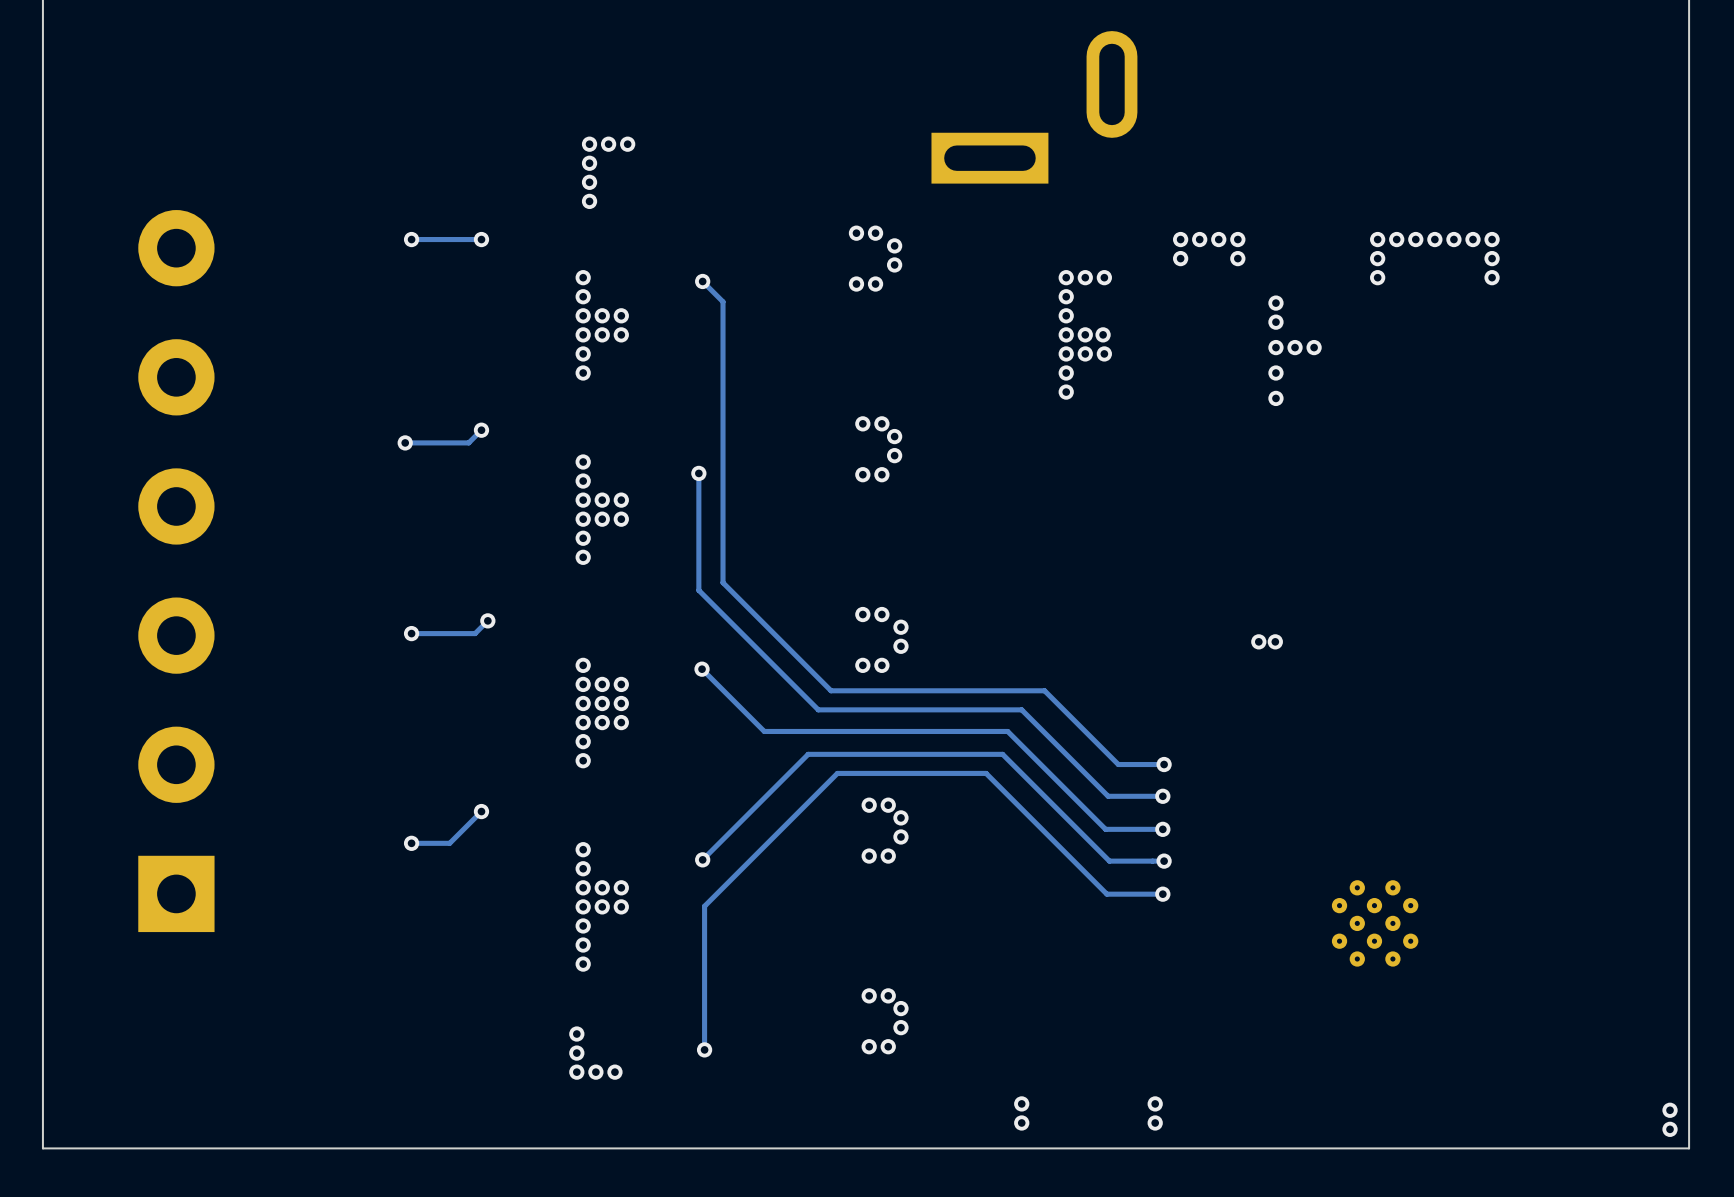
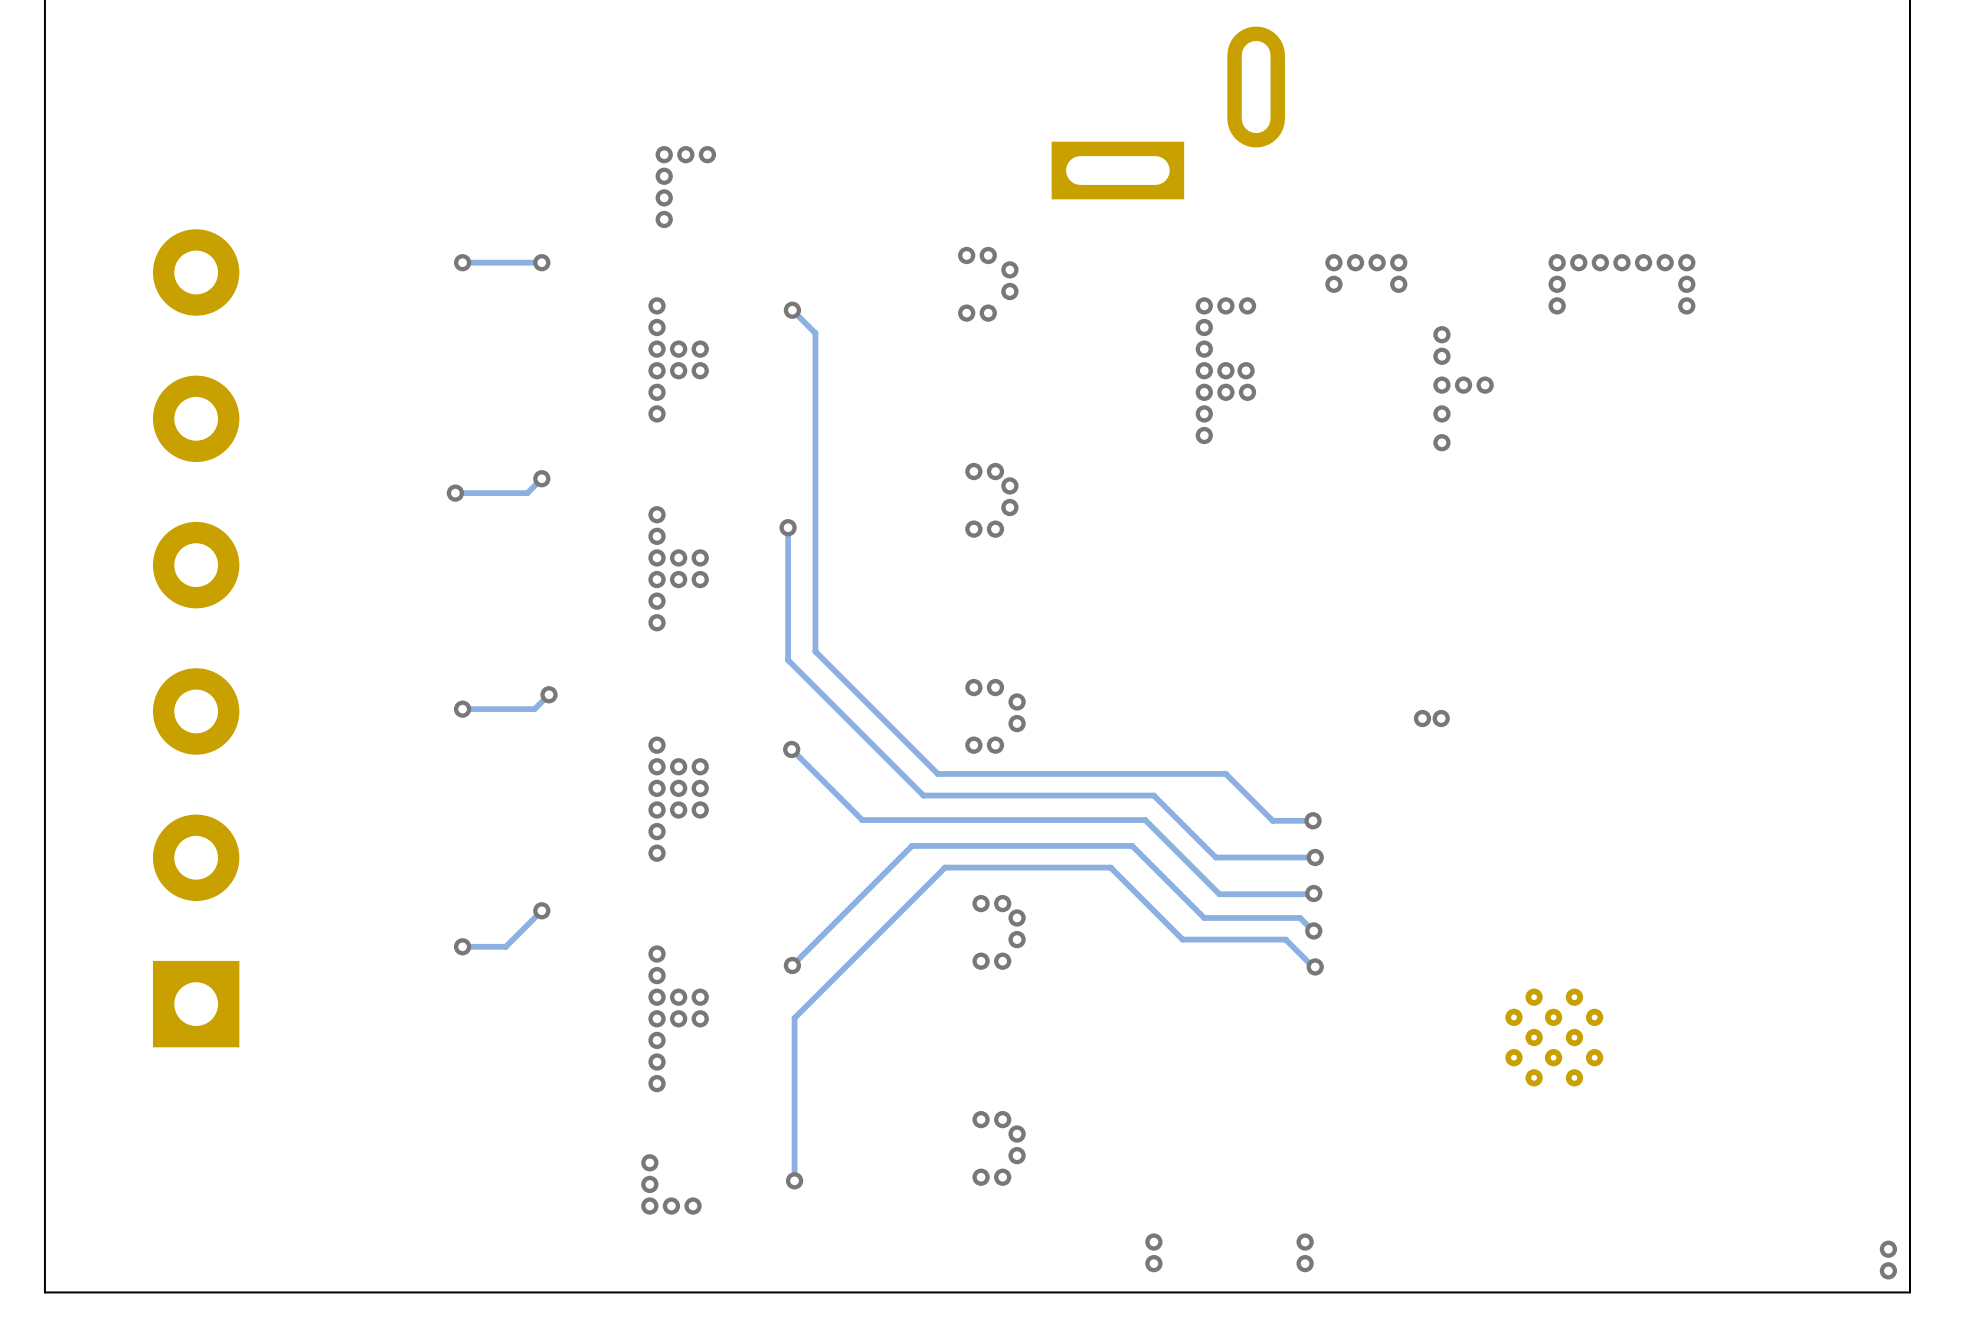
track: (1044, 690) (1118, 764) -> (1179, 773) (1225, 773) (1272, 820) (1313, 820)
track: (1007, 731) (1105, 829) (1162, 829) -> (1138, 820) (1145, 820) (1219, 894) (1313, 894)
via: none -> (1313, 820)
track: (1076, 764) (1108, 796) (1162, 796) -> (1215, 857) (1263, 857)
track: (983, 773) (986, 773) (1106, 894) (1162, 894) -> (1110, 867) (1182, 939) (1285, 939) (1313, 966)
track: (1066, 817) (1109, 861) (1164, 861) -> (1204, 917) (1300, 917) (1313, 930)
via: (1162, 894) -> none

